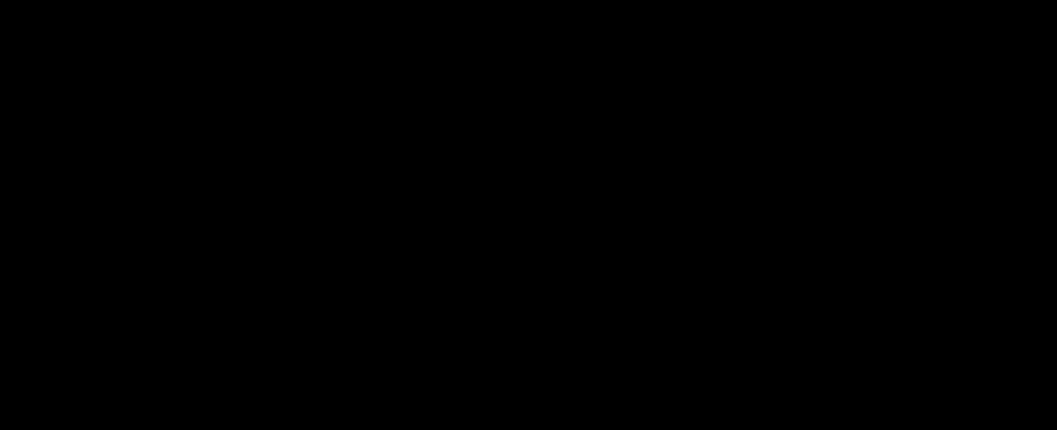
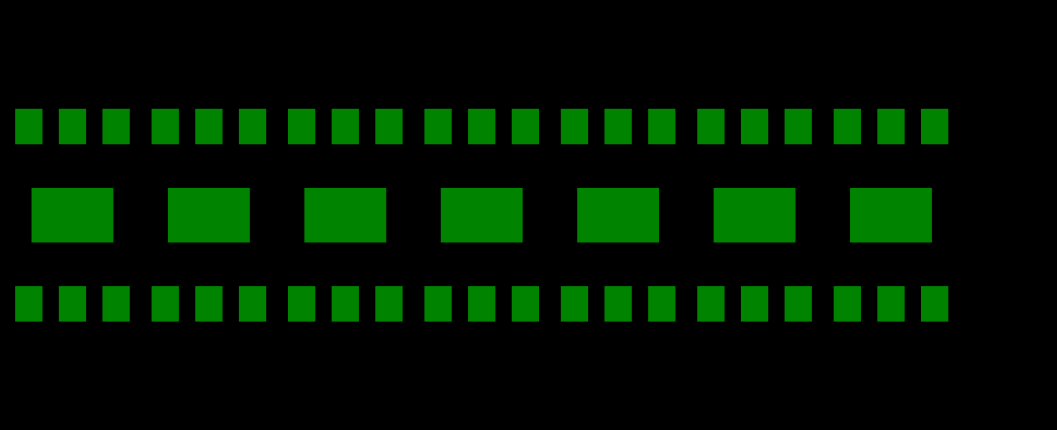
part: none -> (72, 215)
part: none -> (208, 215)
part: none -> (345, 215)
part: none -> (481, 215)
part: none -> (618, 215)
part: none -> (754, 215)
part: none -> (890, 215)

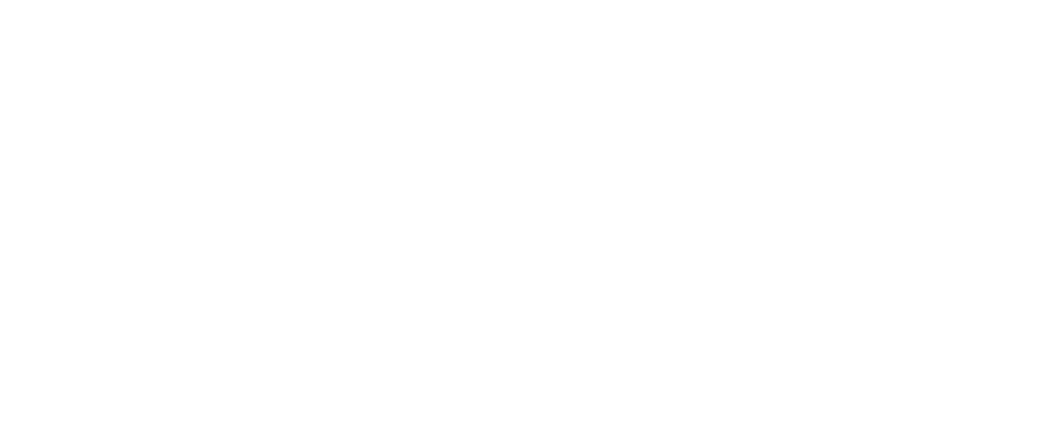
part: (72, 215) -> none
part: (208, 215) -> none
part: (345, 215) -> none
part: (481, 215) -> none
part: (618, 215) -> none
part: (754, 215) -> none
part: (890, 215) -> none

